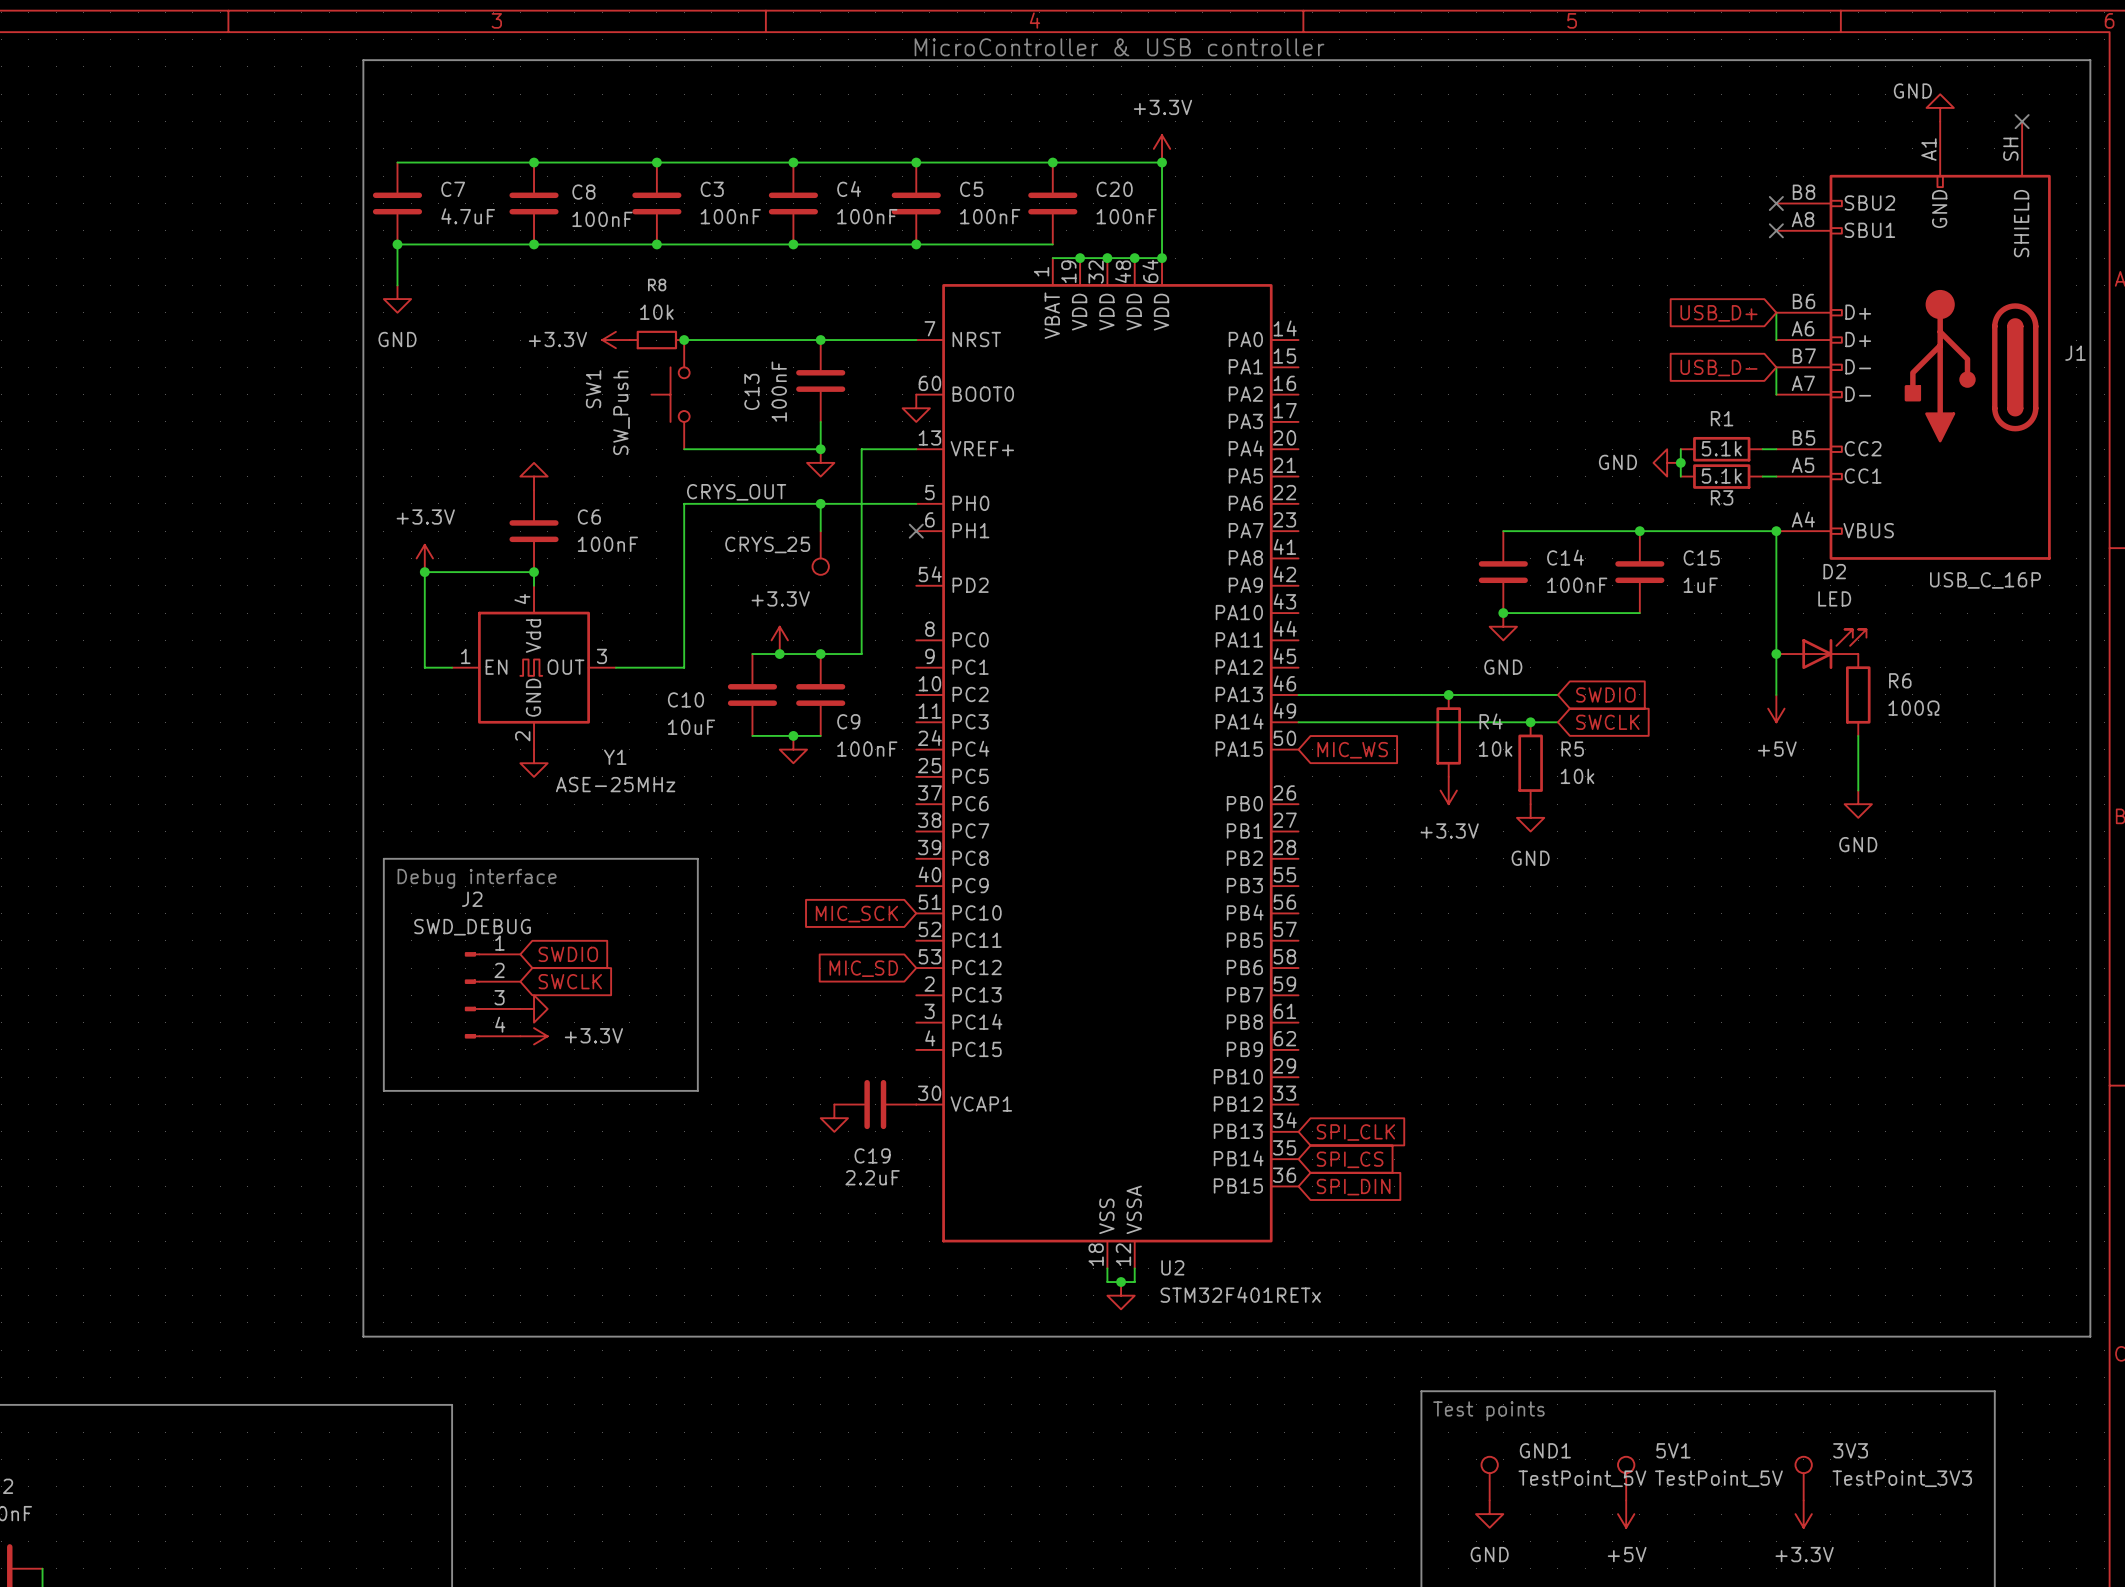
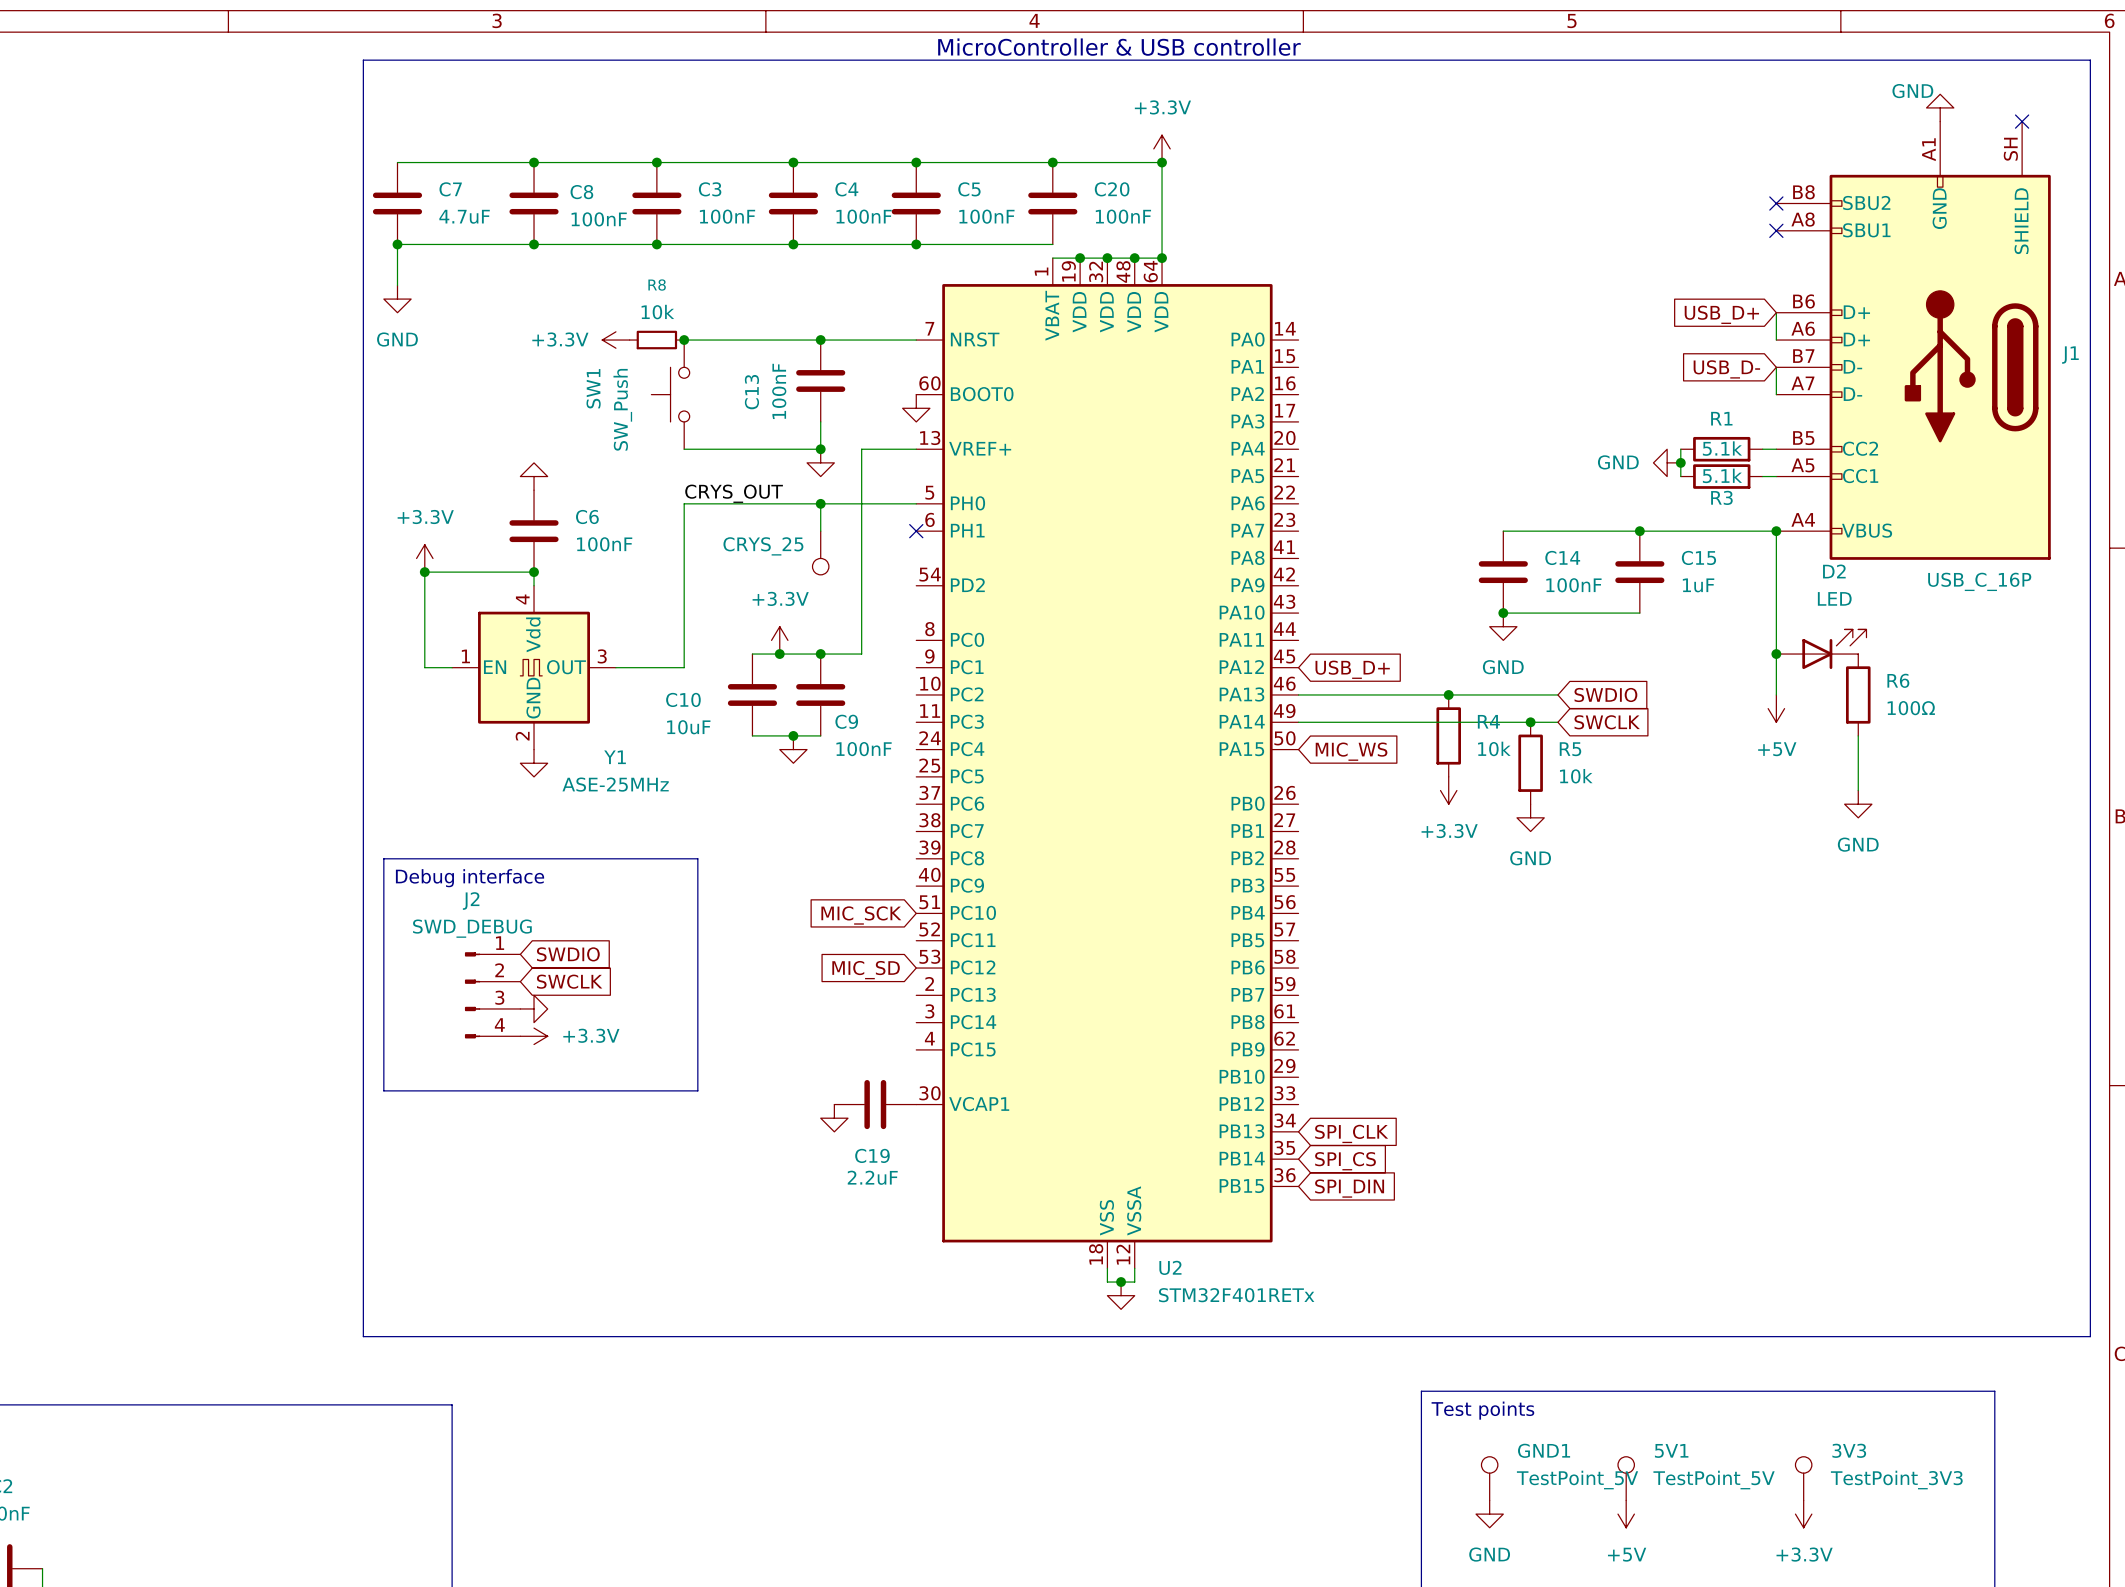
global label: none -> USB_D+ (1352, 669)

